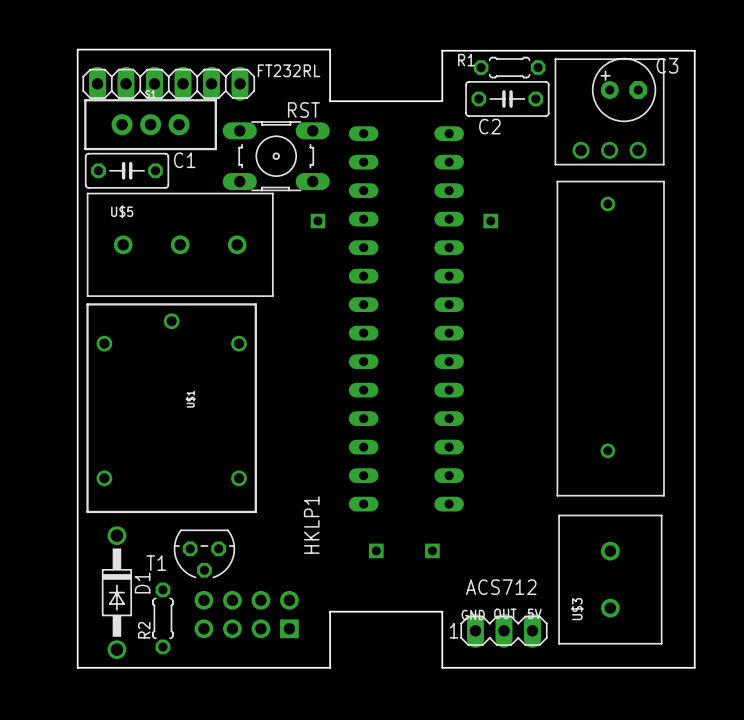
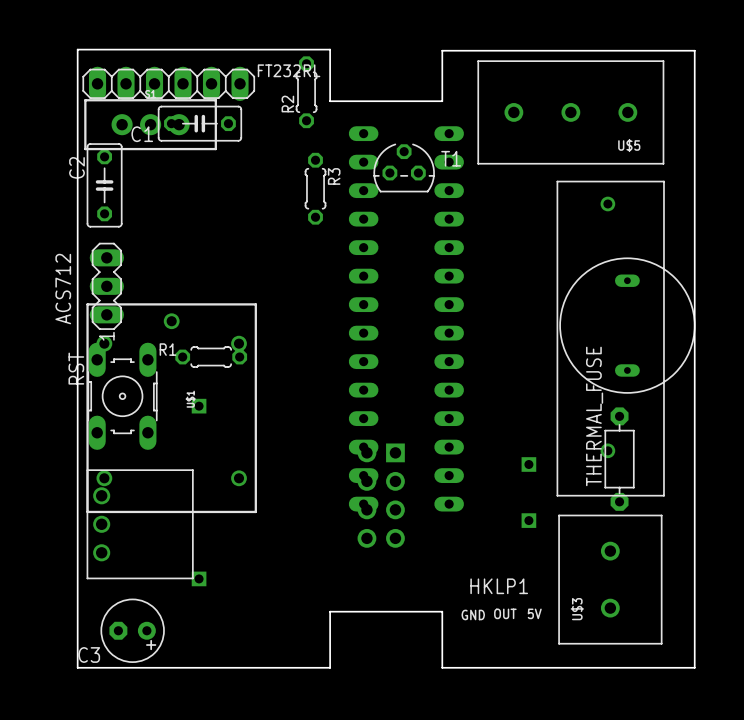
R1 position: (509, 67) -> (211, 357)
C3 rotation: 0° (624, 90) -> 180° (132, 630)
C3 position: (624, 90) -> (132, 630)
C2 rotation: 0° (507, 98) -> 90° clockwise (104, 185)
C2 position: (507, 98) -> (104, 185)
part: (609, 111) -> none
RST: (276, 156) -> none
C1 rotation: 0° (127, 170) -> 180° (199, 123)
C1 position: (127, 170) -> (199, 123)
R3: none -> (315, 188)
U$5 name position: U$5 (122, 211) -> U$5 (629, 145)
U$5 position: (180, 244) -> (570, 112)
part: none -> (627, 325)
HKLP1 rotation: 0° (404, 385) -> 90° counterclockwise (363, 492)
RST: none -> (122, 396)
THERMAL_FUSE: none -> (619, 459)
part: none -> (140, 524)
T1 rotation: 0° (204, 553) -> 180° (404, 167)
T1 position: (204, 553) -> (404, 167)
D1: (116, 592) -> none
part rotation: 0° (246, 614) -> 90° counterclockwise (381, 495)
part position: (246, 614) -> (381, 495)
R2 position: (162, 618) -> (306, 92)
ACS712 rotation: 0° (504, 630) -> 90° counterclockwise (106, 286)
ACS712 position: (504, 630) -> (106, 286)

